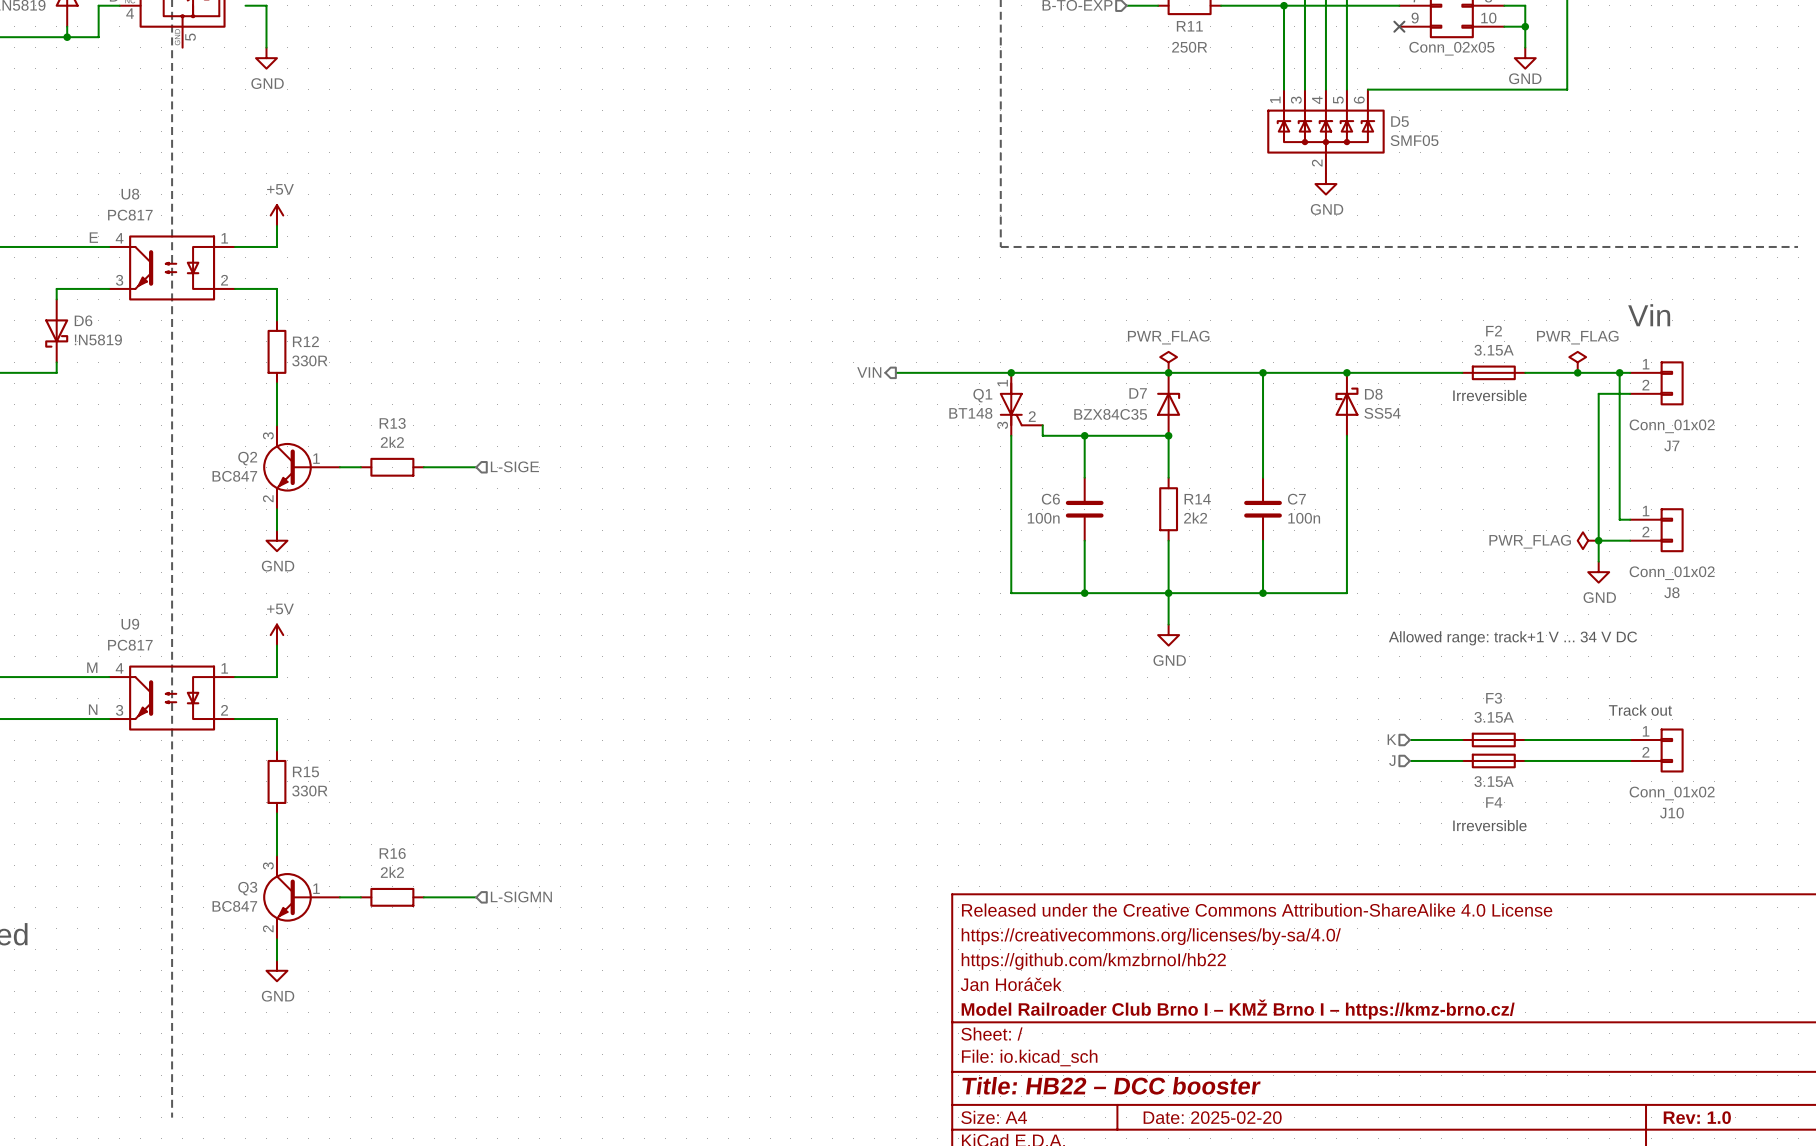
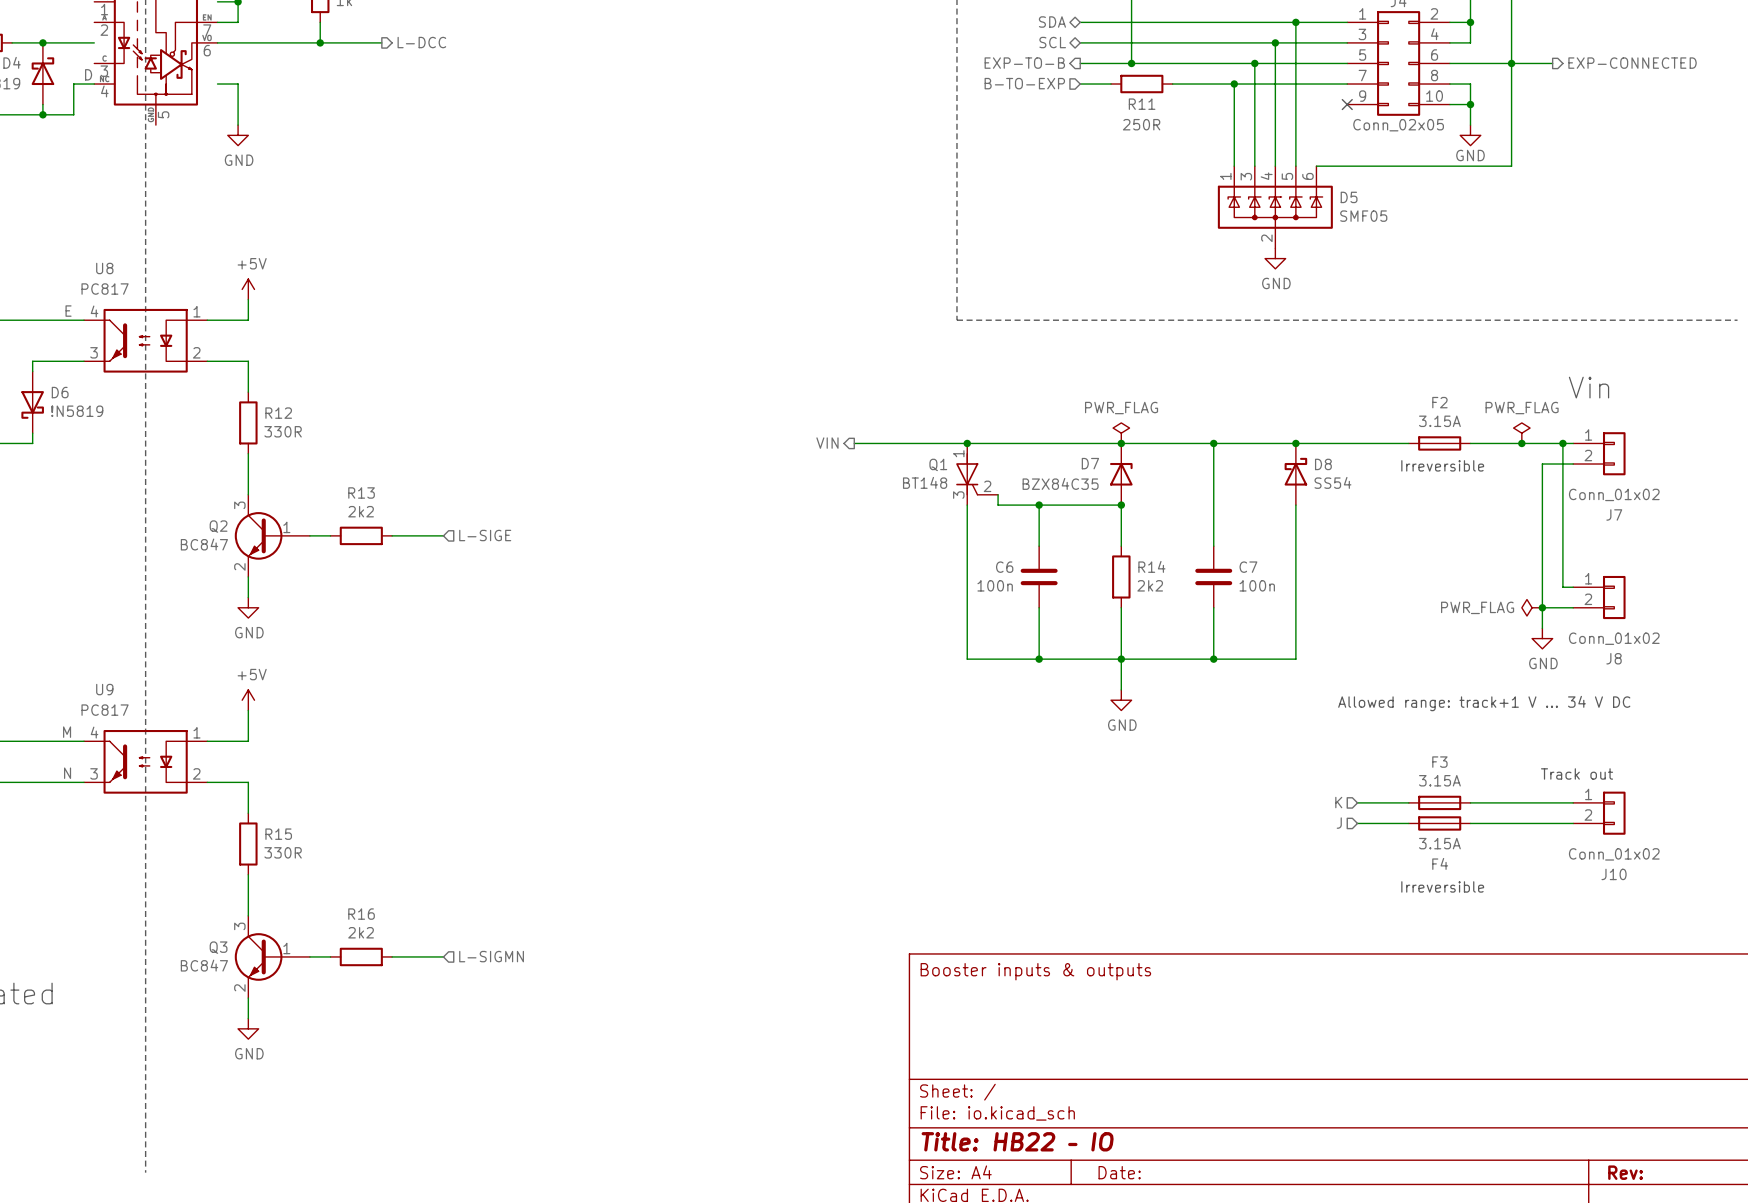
title block: Released under the Creative Commons Attribution-ShareAlike 4.0 License (1257, 910) -> Booster inputs & outputs (1035, 971)
title block: https://creativecommons.org/licenses/by-sa/4.0/ (1151, 936) -> none
title block: https://github.com/kmzbrnoI/hb22 (1093, 961) -> none
title block: Jan Horáček (1011, 984) -> none
title block: Model Railroader Club Brno I – KMŽ Brno I – https://kmz-brno.cz/ (1238, 1009) -> none
title block: Title: HB22 – DCC booster (1111, 1085) -> Title: HB22 – IO (1017, 1141)
title block: Date: 2025-02-20 (1212, 1117) -> Date: (1119, 1172)
title block: Rev: 1.0 (1697, 1117) -> Rev: (1625, 1172)

